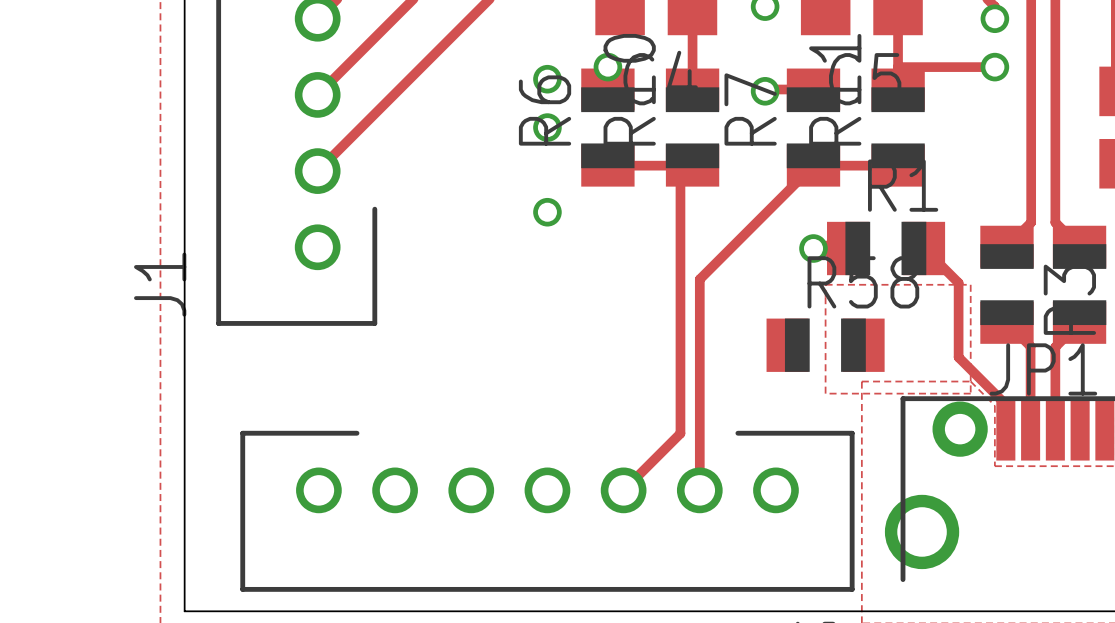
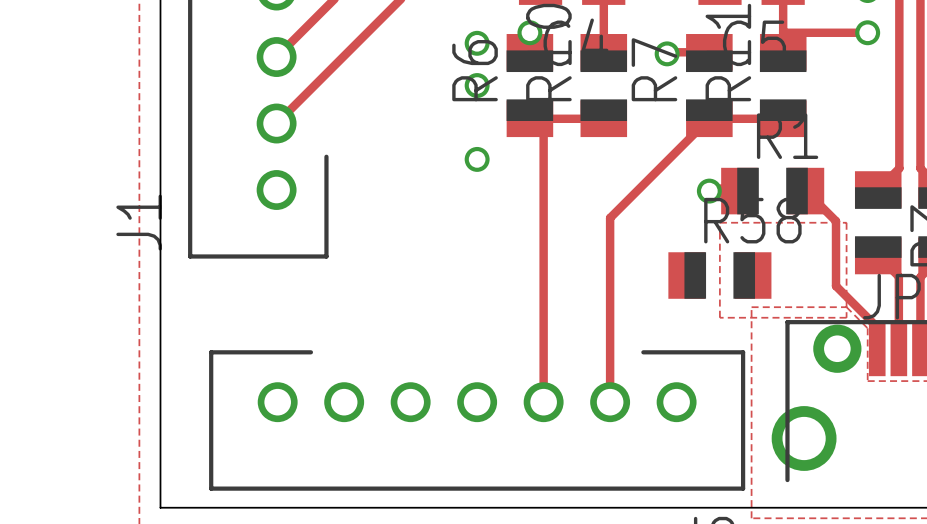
track: (692, 165) (680, 177) (680, 433) (623, 490) -> (529, 118) (543, 132) (543, 402)

